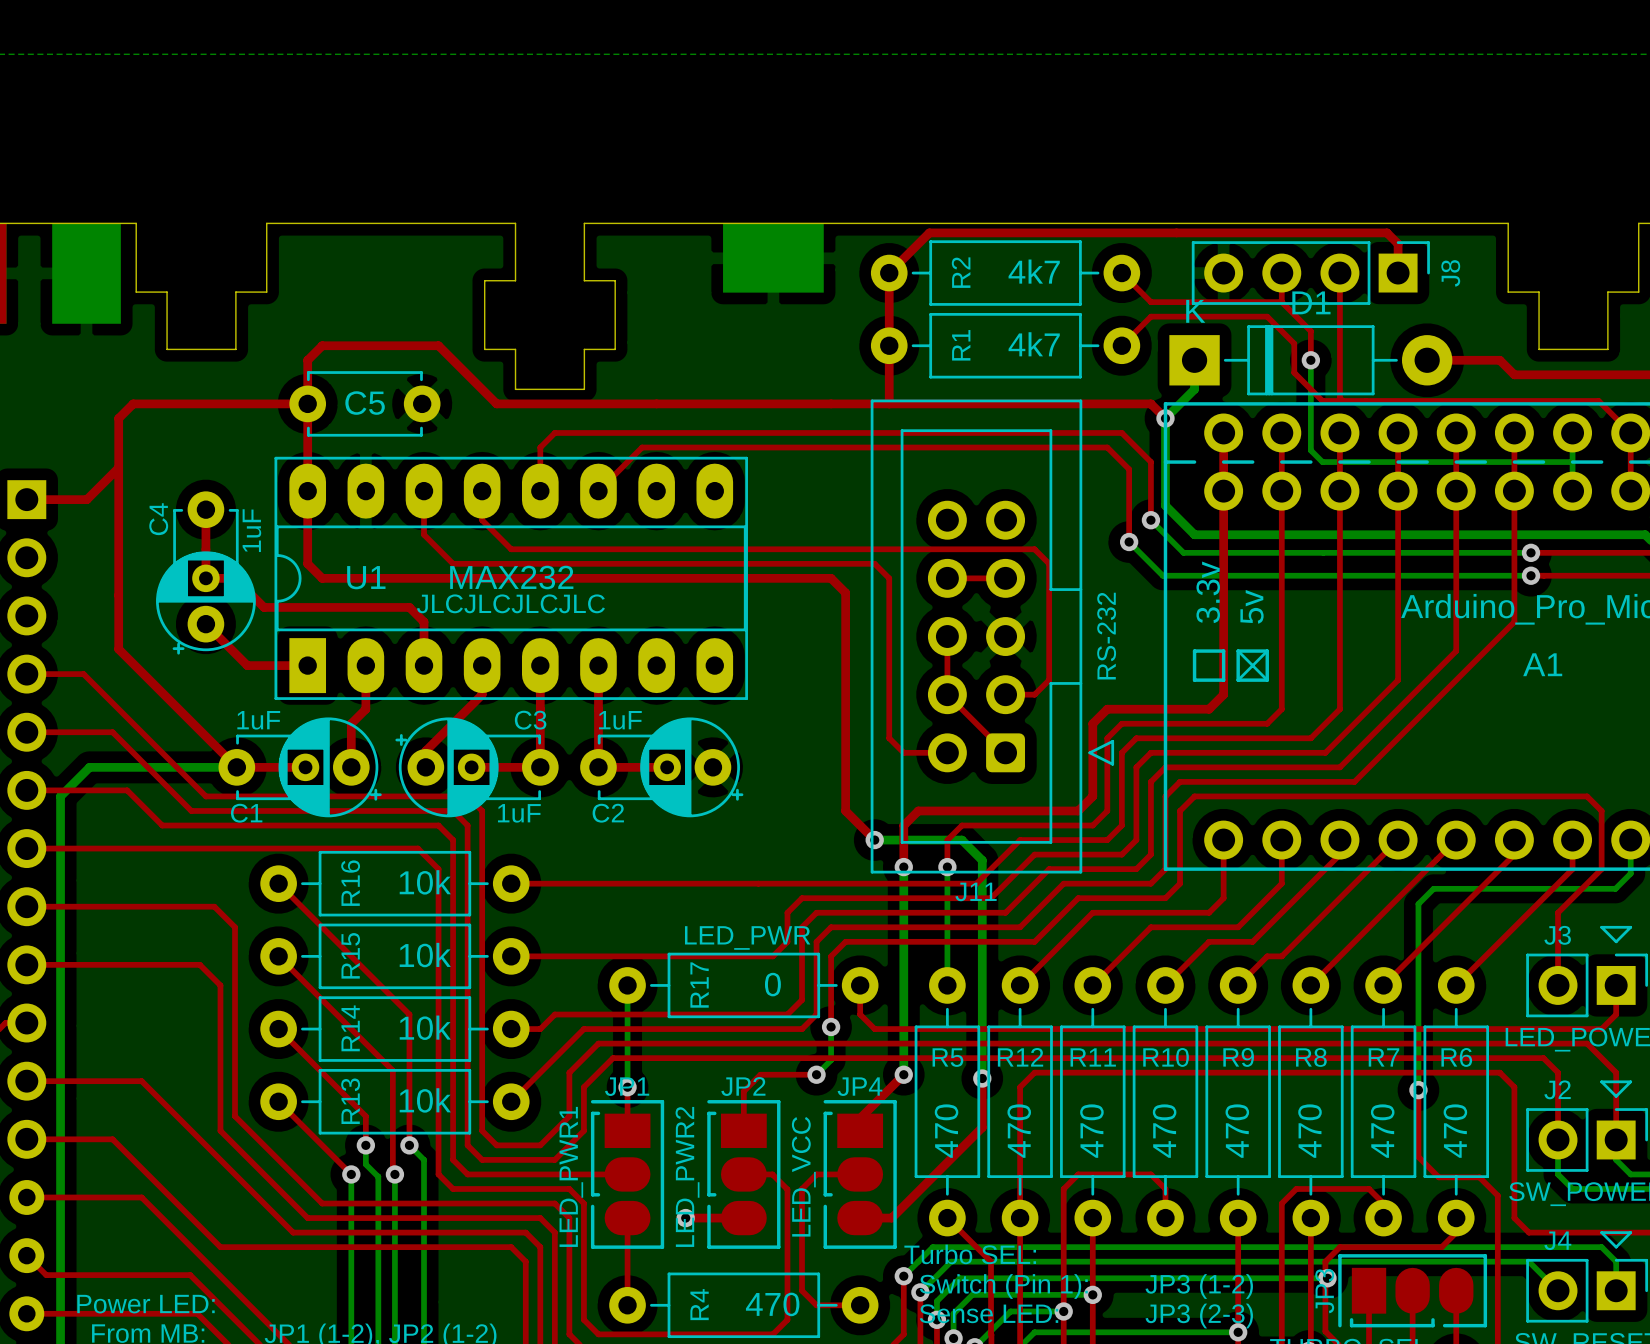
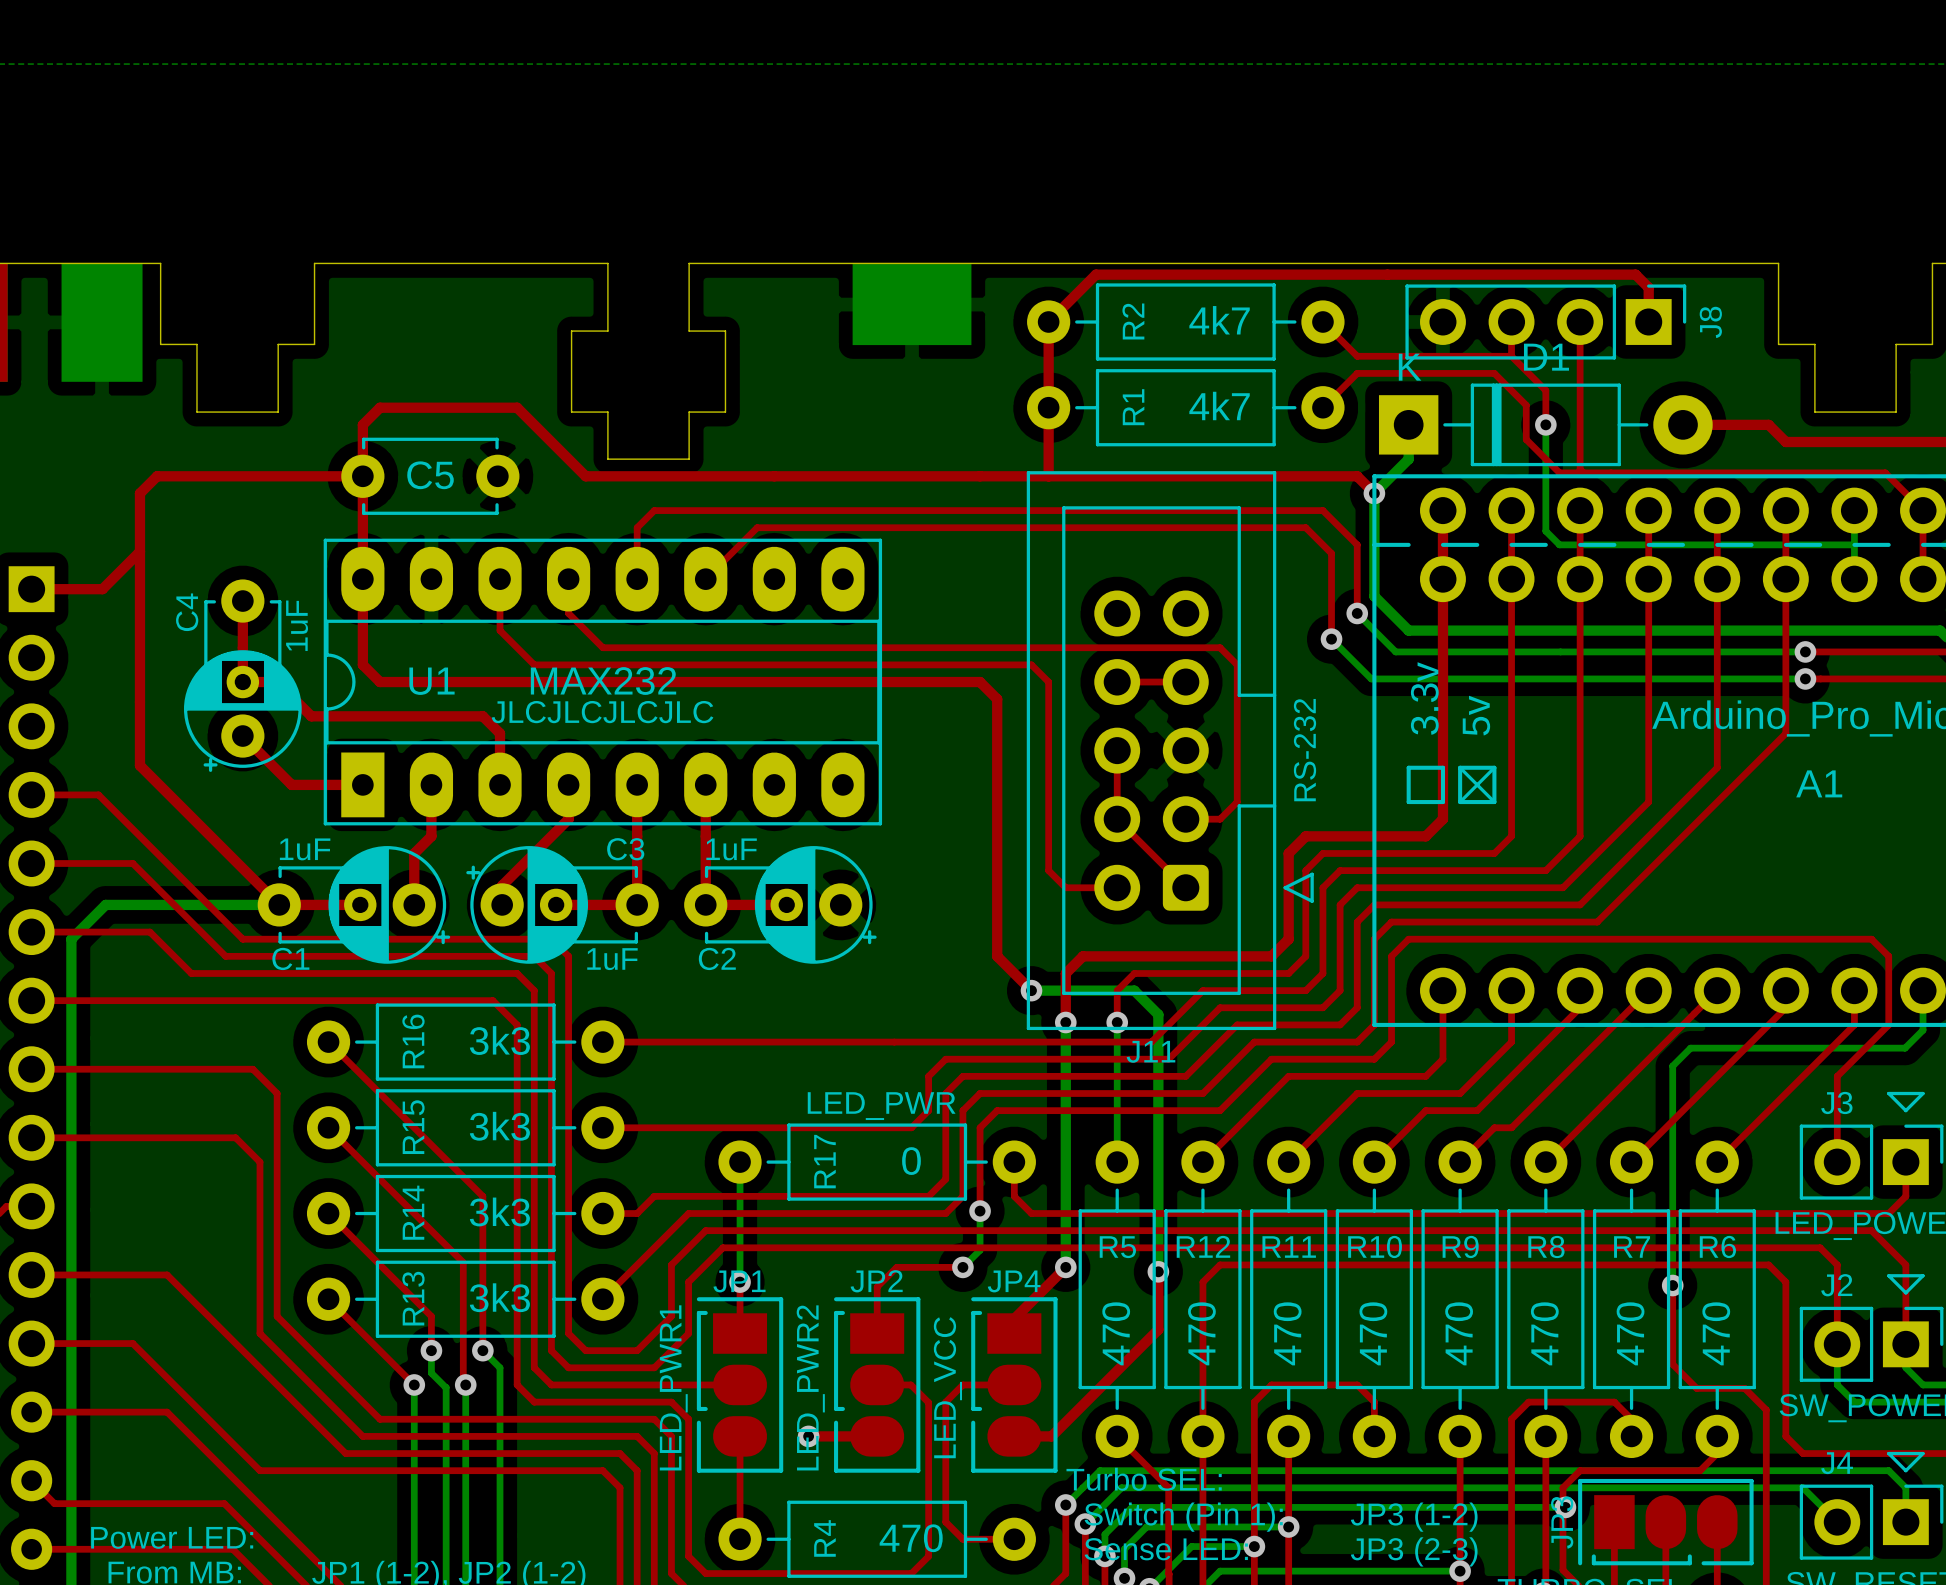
R16 value: 10k (425, 882) -> 3k3 (499, 1040)
R15 value: 10k (425, 955) -> 3k3 (499, 1126)
R14 value: 10k (425, 1027) -> 3k3 (499, 1211)
R13 value: 10k (425, 1100) -> 3k3 (499, 1297)

